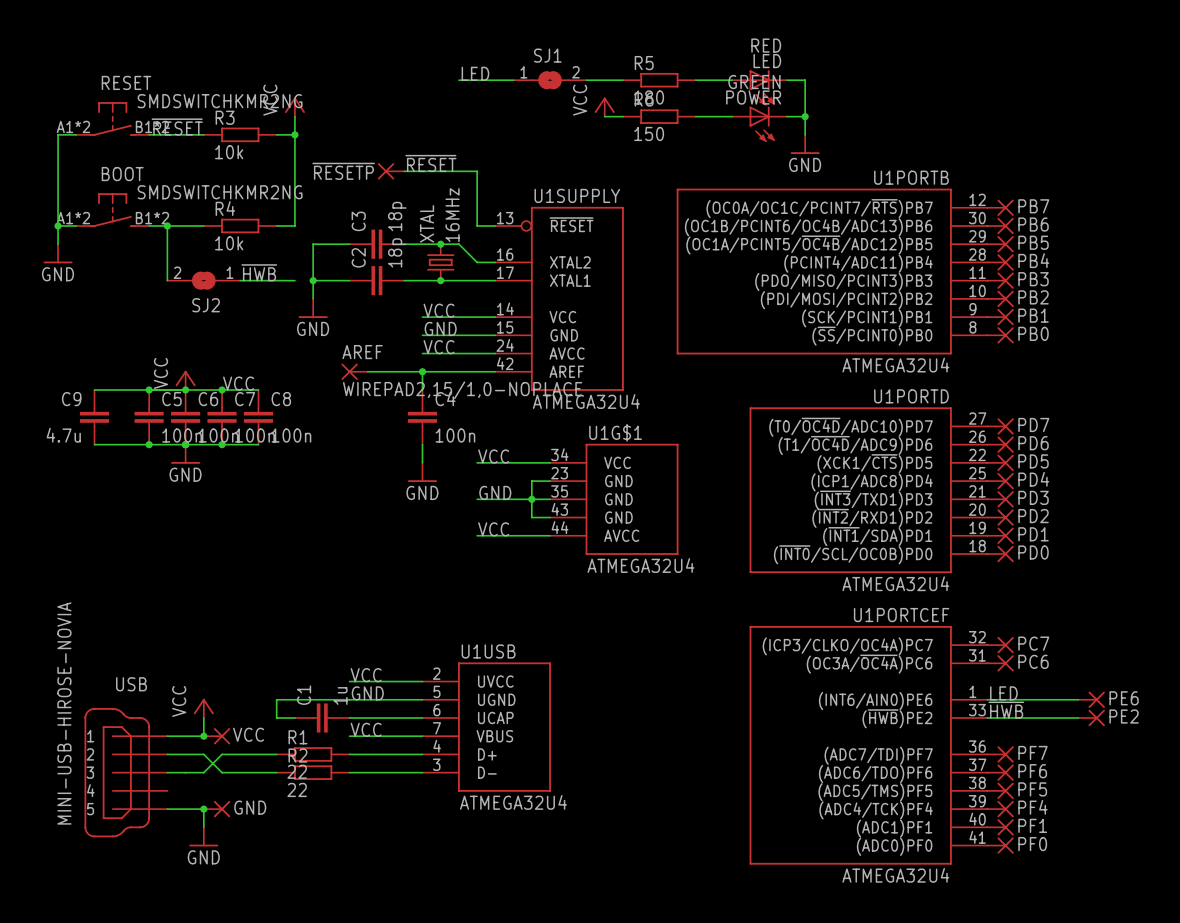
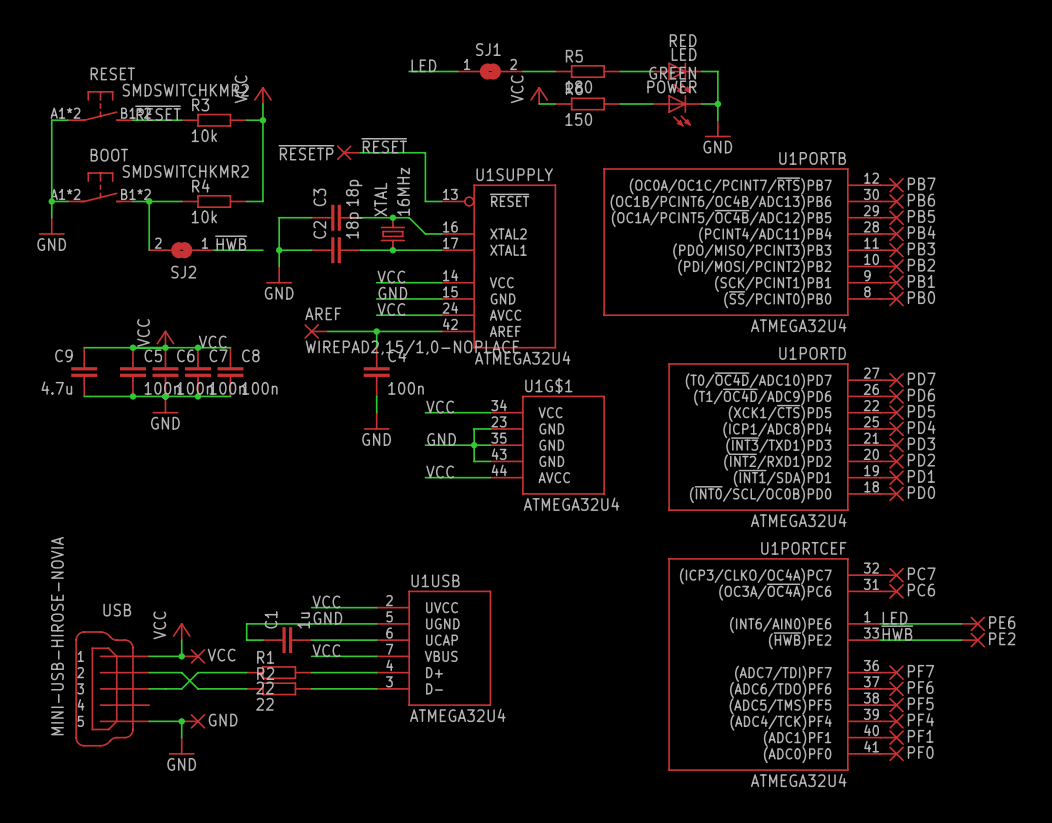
RESET value: SMDSWITCHKMR2NG (220, 101) -> SMDSWITCHKMR2 (185, 90)
BOOT value: SMDSWITCHKMR2NG (220, 192) -> SMDSWITCHKMR2 (185, 171)

